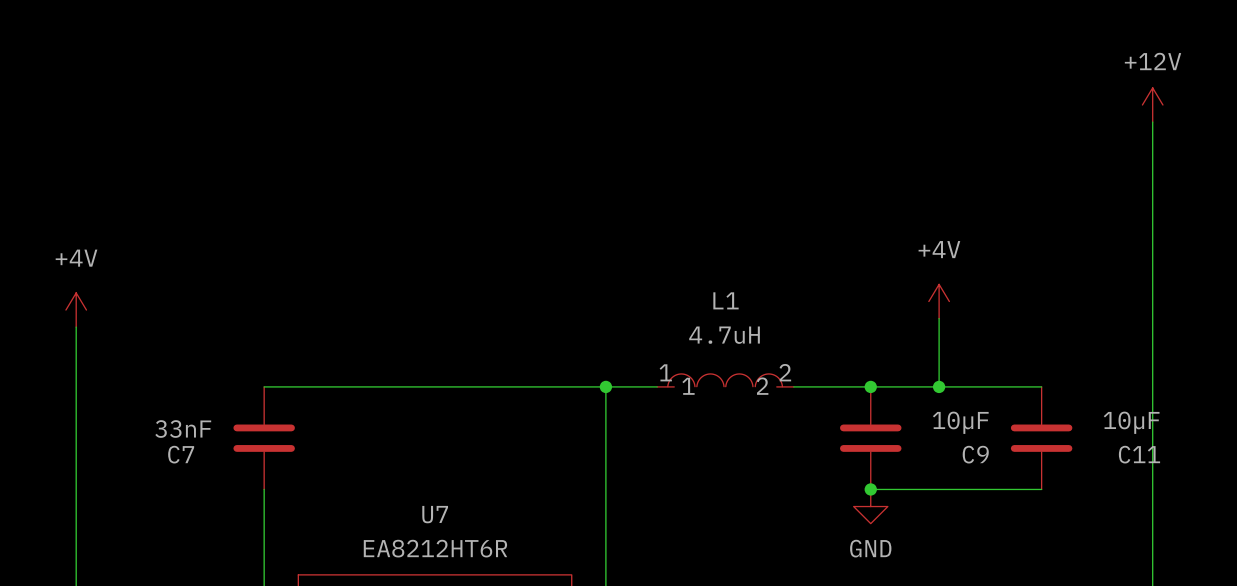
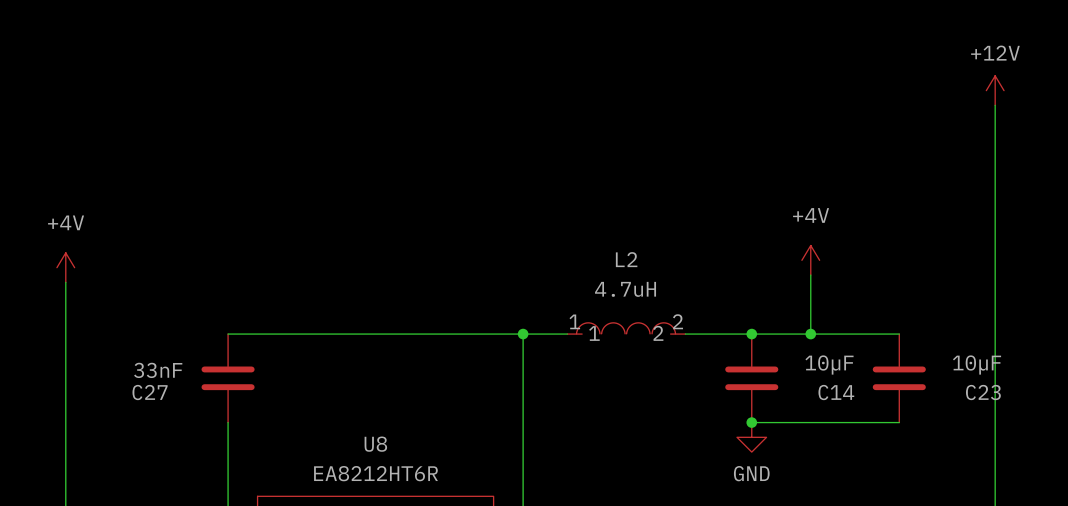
L1 name: L1 (726, 300) -> L2 (626, 259)
C7 name: C7 (181, 454) -> C27 (150, 392)
C9 name: C9 (975, 454) -> C14 (836, 392)
C11 name: C11 (1139, 454) -> C23 (983, 392)
U7 name: U7 (435, 514) -> U8 (375, 444)

